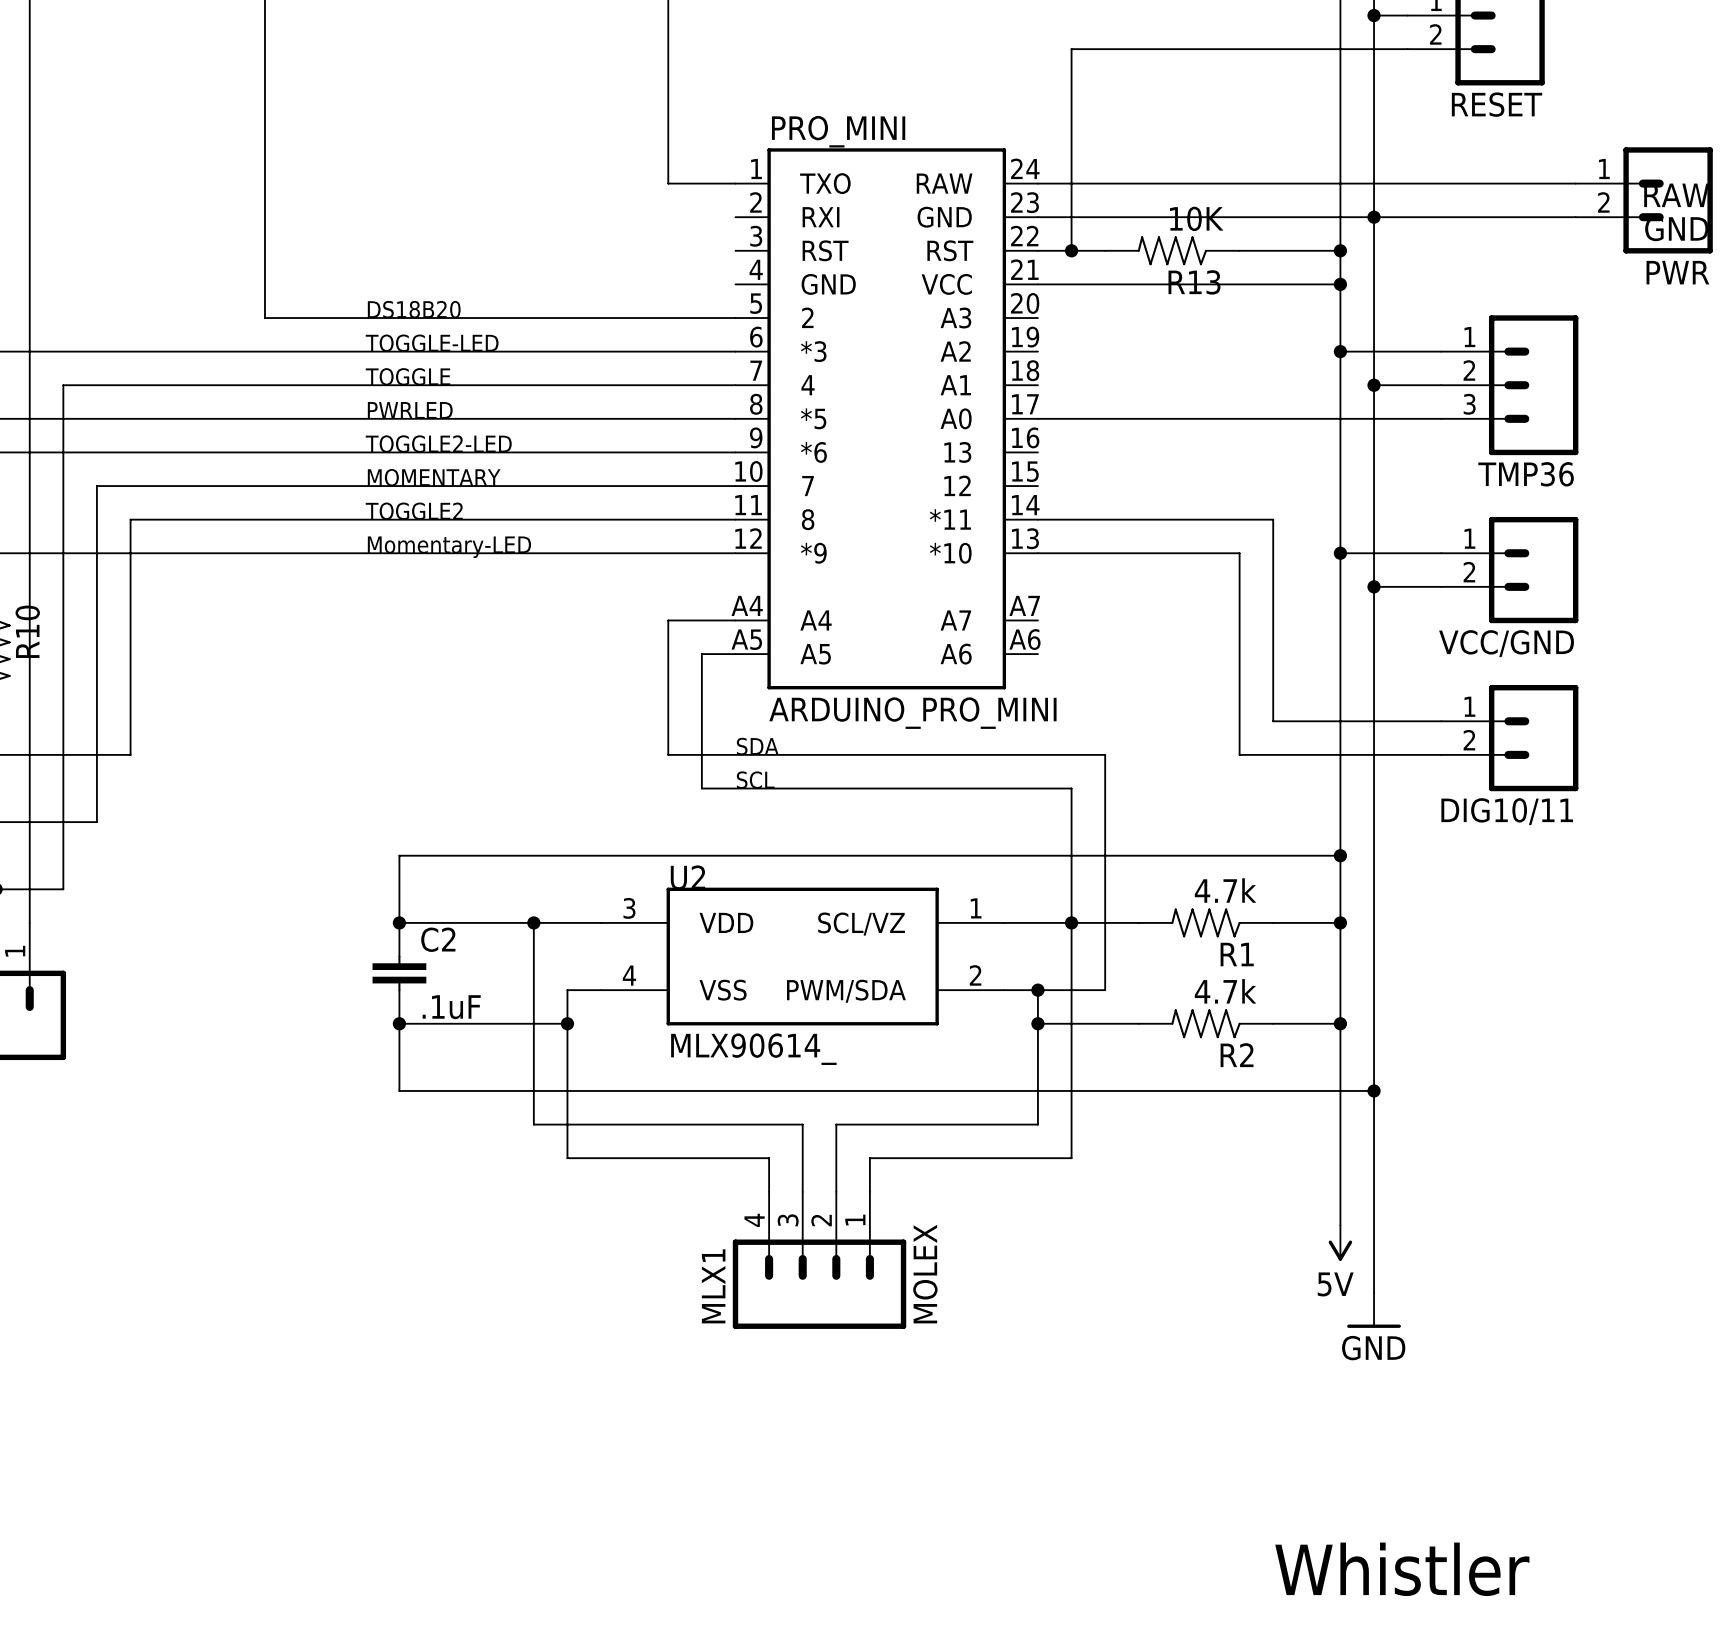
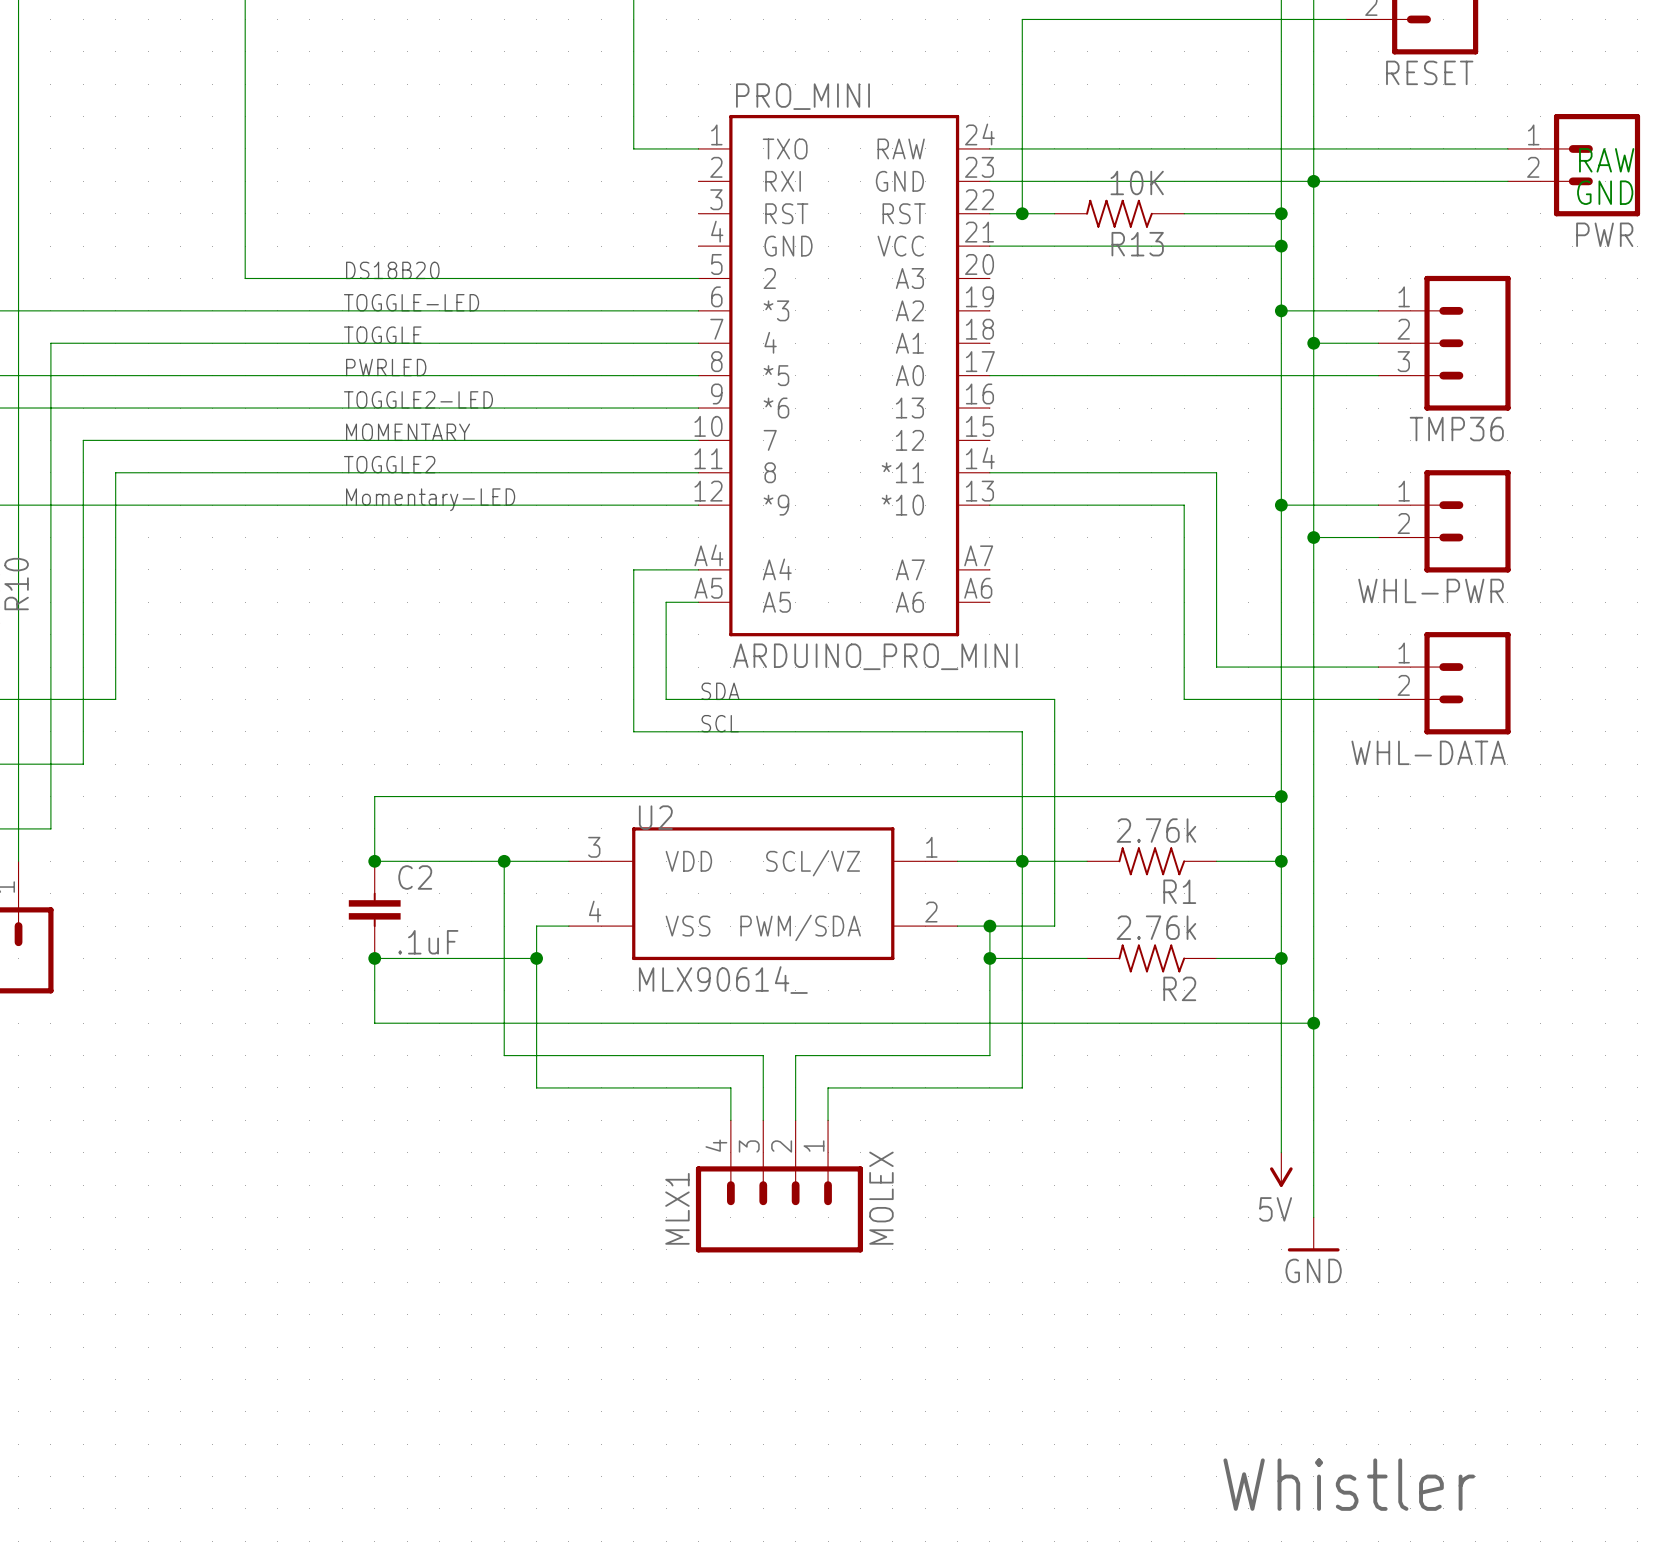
VCC/GND name: VCC/GND (1506, 643) -> WHL-PWR (1431, 590)
wire: (668, 754) (701, 754) (701, 788) -> (633, 699) (633, 731) (666, 731)
DIG10/11 name: DIG10/11 (1507, 811) -> WHL-DATA (1428, 752)
R1 value: 4.7k (1225, 890) -> 2.76k (1156, 830)
R2 value: 4.7k (1225, 991) -> 2.76k (1156, 927)

